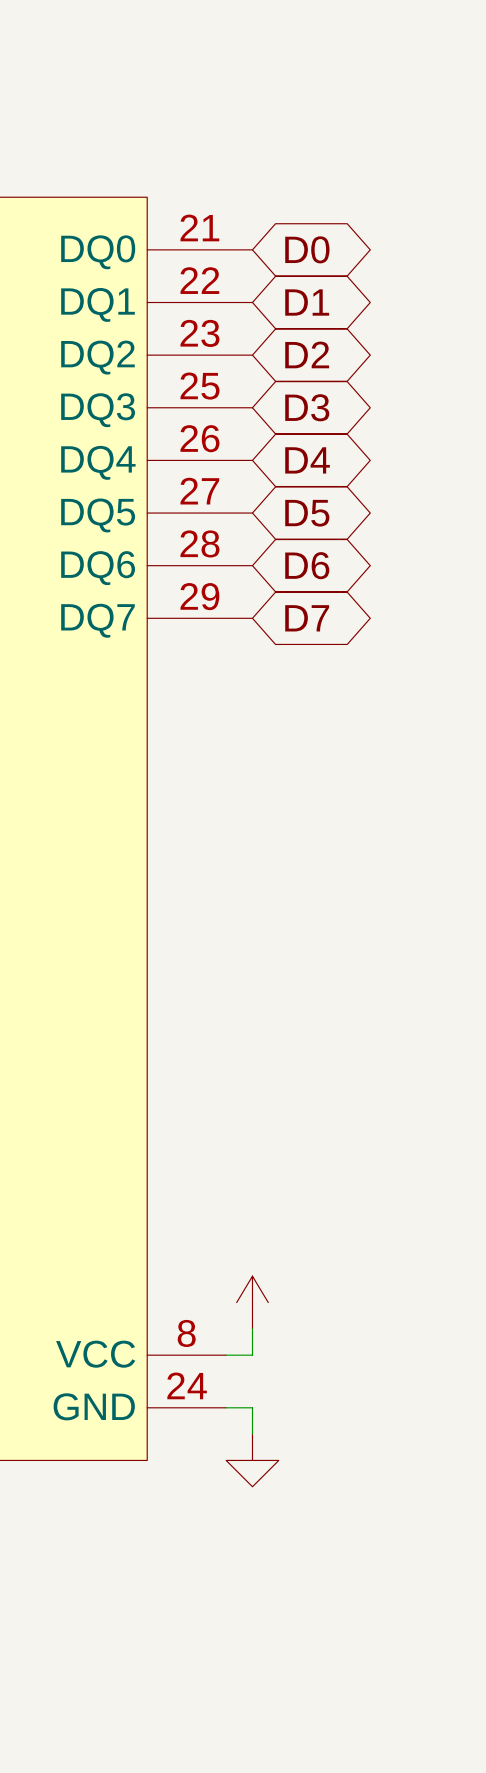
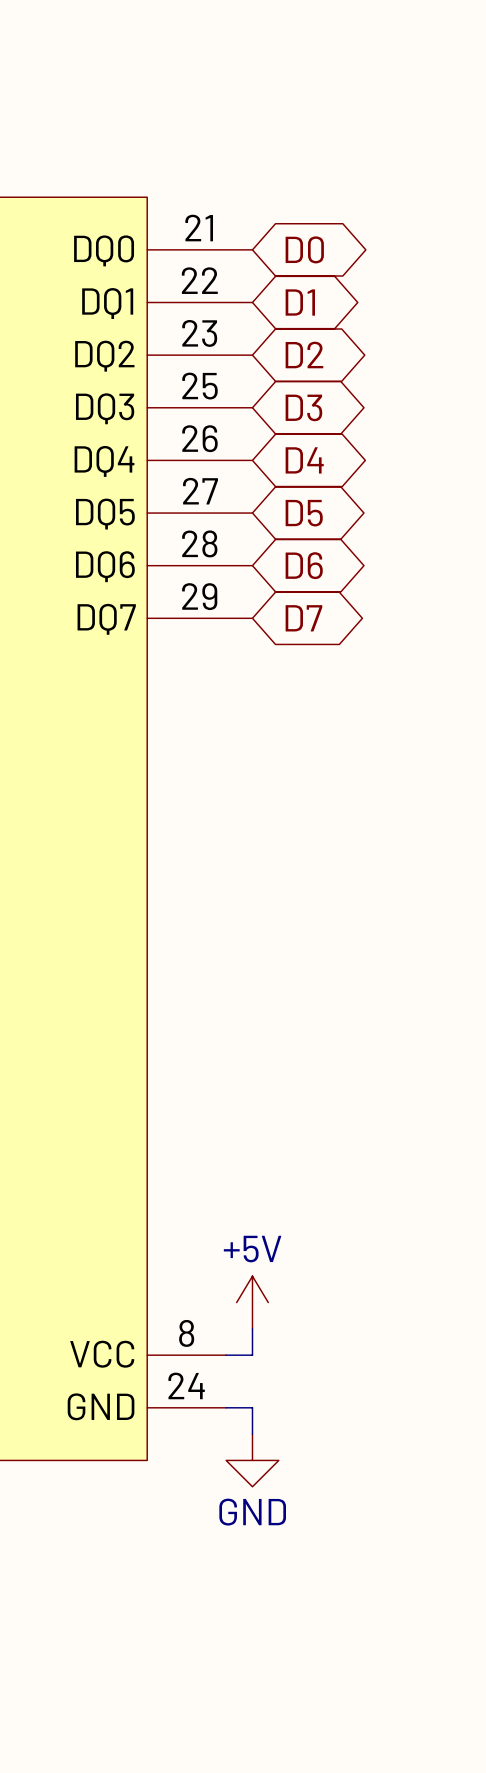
power symbol text: none -> +5V (252, 1249)
power symbol text: none -> GND (252, 1512)

